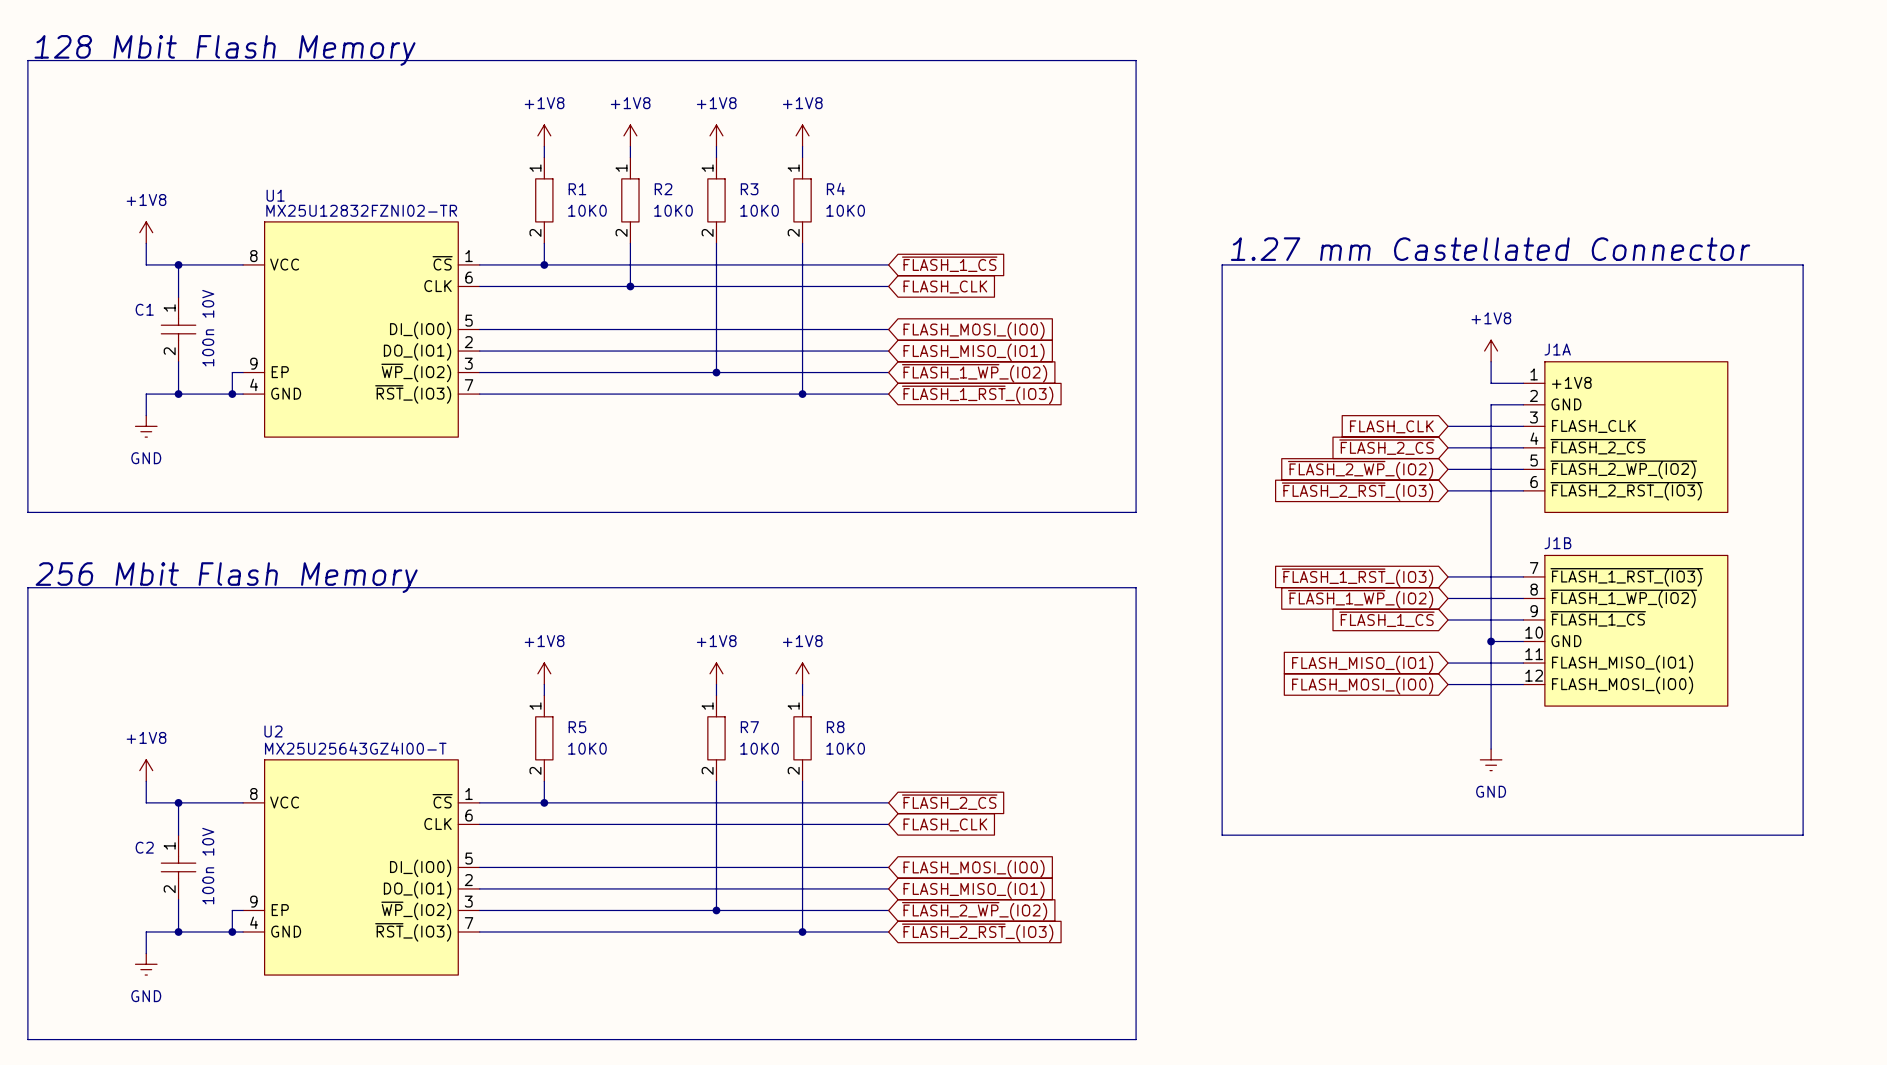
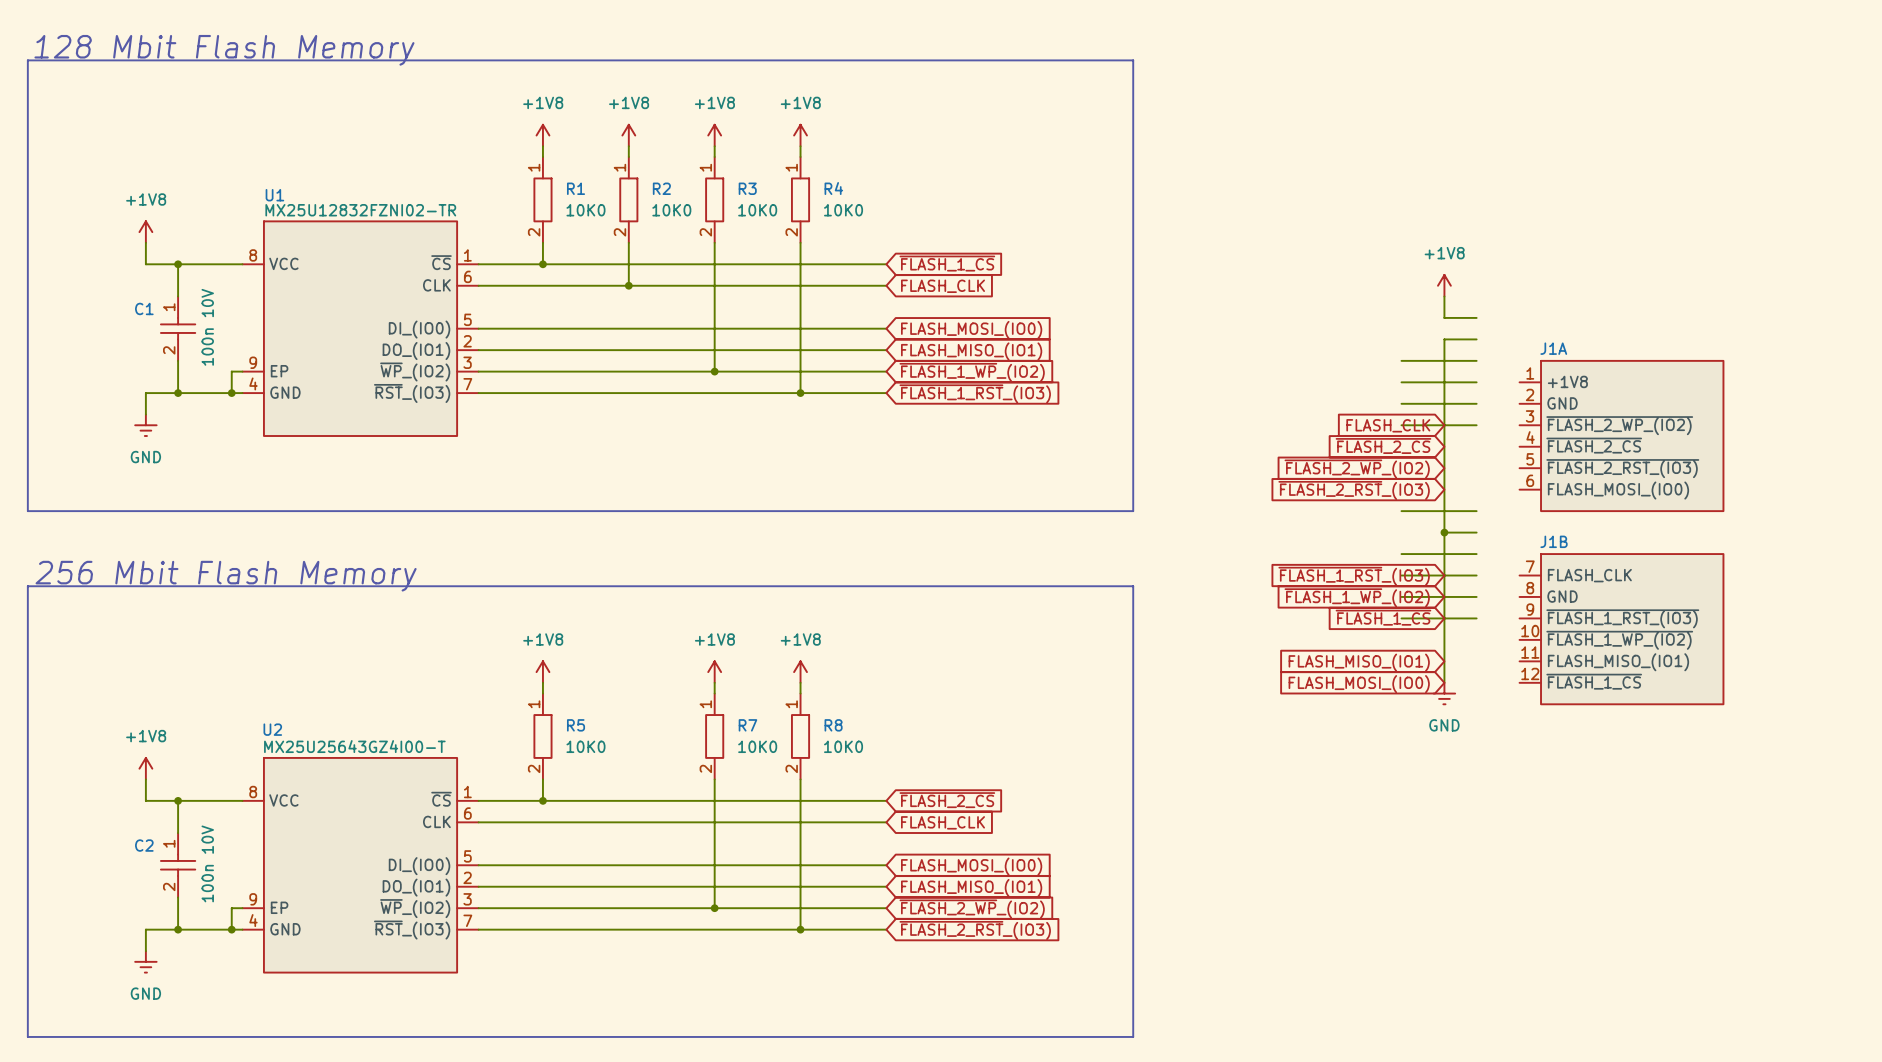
text: 1.27 mm Castellated Connector (1490, 249) -> none
line: (1222, 264) (1803, 264) (1803, 835) (1222, 835) (1222, 264) -> none
power symbol position: +1V8 (1491, 351) -> +1V8 (1444, 285)
wire: (1491, 361) (1491, 383) (1523, 383) -> (1444, 296) (1444, 317) (1476, 317)
wire: (1523, 404) (1491, 404) (1491, 749) -> none
wire: (1480, 426) (1523, 426) -> (1401, 425) (1444, 425)
J1A pin name: FLASH_CLK (1593, 426) -> ~{FLASH_2_WP_(IO2)} (1619, 425)
wire: (1448, 447) (1523, 447) -> (1401, 382) (1476, 382)
wire: (1448, 469) (1523, 469) -> (1401, 403) (1476, 403)
J1A pin name: ~{FLASH_2_WP_(IO2)} (1623, 469) -> ~{FLASH_2_RST_(IO3)} (1622, 468)
wire: (1448, 490) (1523, 490) -> (1401, 360) (1476, 360)
J1A pin name: ~{FLASH_2_RST_(IO3)} (1626, 491) -> FLASH_MOSI_(IO0) (1618, 490)
wire: none -> (1401, 511) (1476, 511)
junction: none -> (1444, 532)
wire: (1480, 576) (1523, 576) -> (1401, 575) (1444, 575)
J1B pin name: ~{FLASH_1_RST_(IO3)} (1626, 577) -> FLASH_CLK (1589, 575)
wire: (1480, 598) (1523, 598) -> (1401, 596) (1444, 596)
J1B pin name: ~{FLASH_1_WP_(IO2)} (1623, 598) -> GND (1562, 596)
J1B pin name: ~{FLASH_1_CS} (1598, 618) -> ~{FLASH_1_RST_(IO3)} (1622, 618)
wire: (1480, 619) (1523, 619) -> (1401, 618) (1444, 618)
wire: (1491, 641) (1523, 641) -> (1444, 532) (1476, 532)
junction: (1491, 641) -> none
J1B pin name: GND (1566, 641) -> ~{FLASH_1_WP_(IO2)} (1619, 640)
wire: (1448, 663) (1523, 663) -> (1401, 554) (1476, 554)
wire: (1448, 684) (1523, 684) -> (1444, 682) (1444, 339) (1476, 339)
J1B pin name: FLASH_MOSI_(IO0) (1622, 685) -> ~{FLASH_1_CS} (1594, 681)
power symbol position: GND (1491, 759) -> GND (1444, 693)

